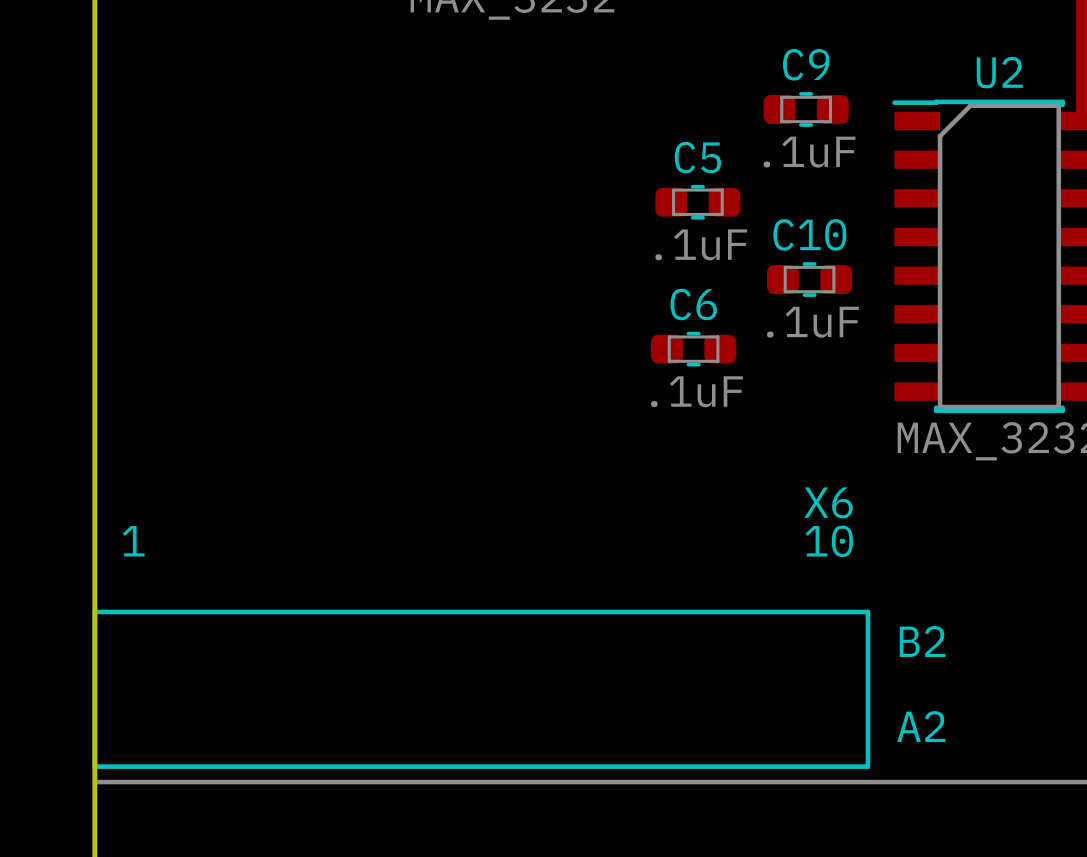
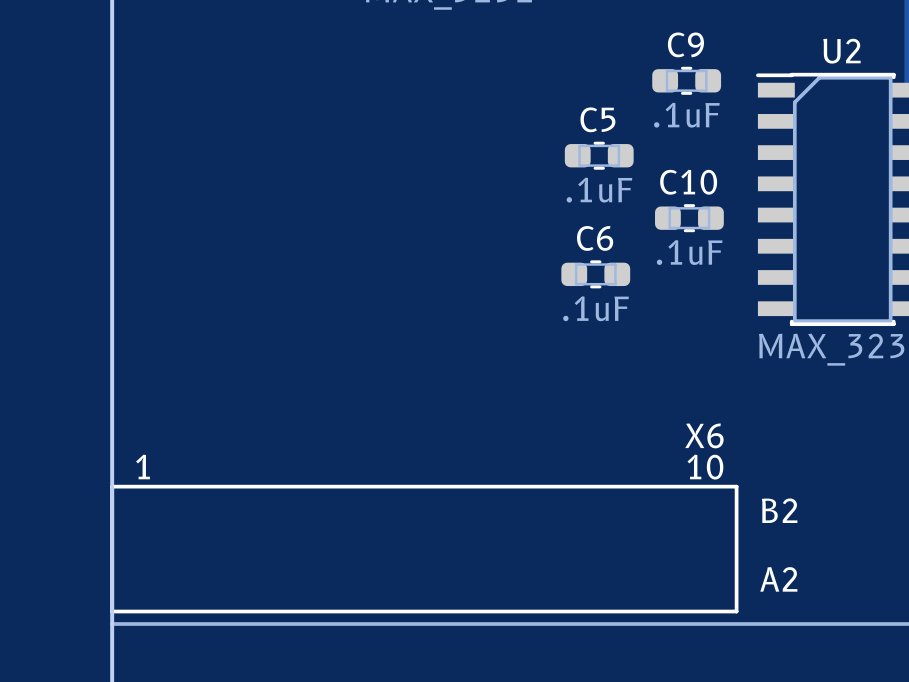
part text position: X6 (828, 502) -> X6 (704, 435)
part text position: 1 (133, 541) -> 1 (143, 466)
part text position: 10 (829, 541) -> 10 (705, 467)

